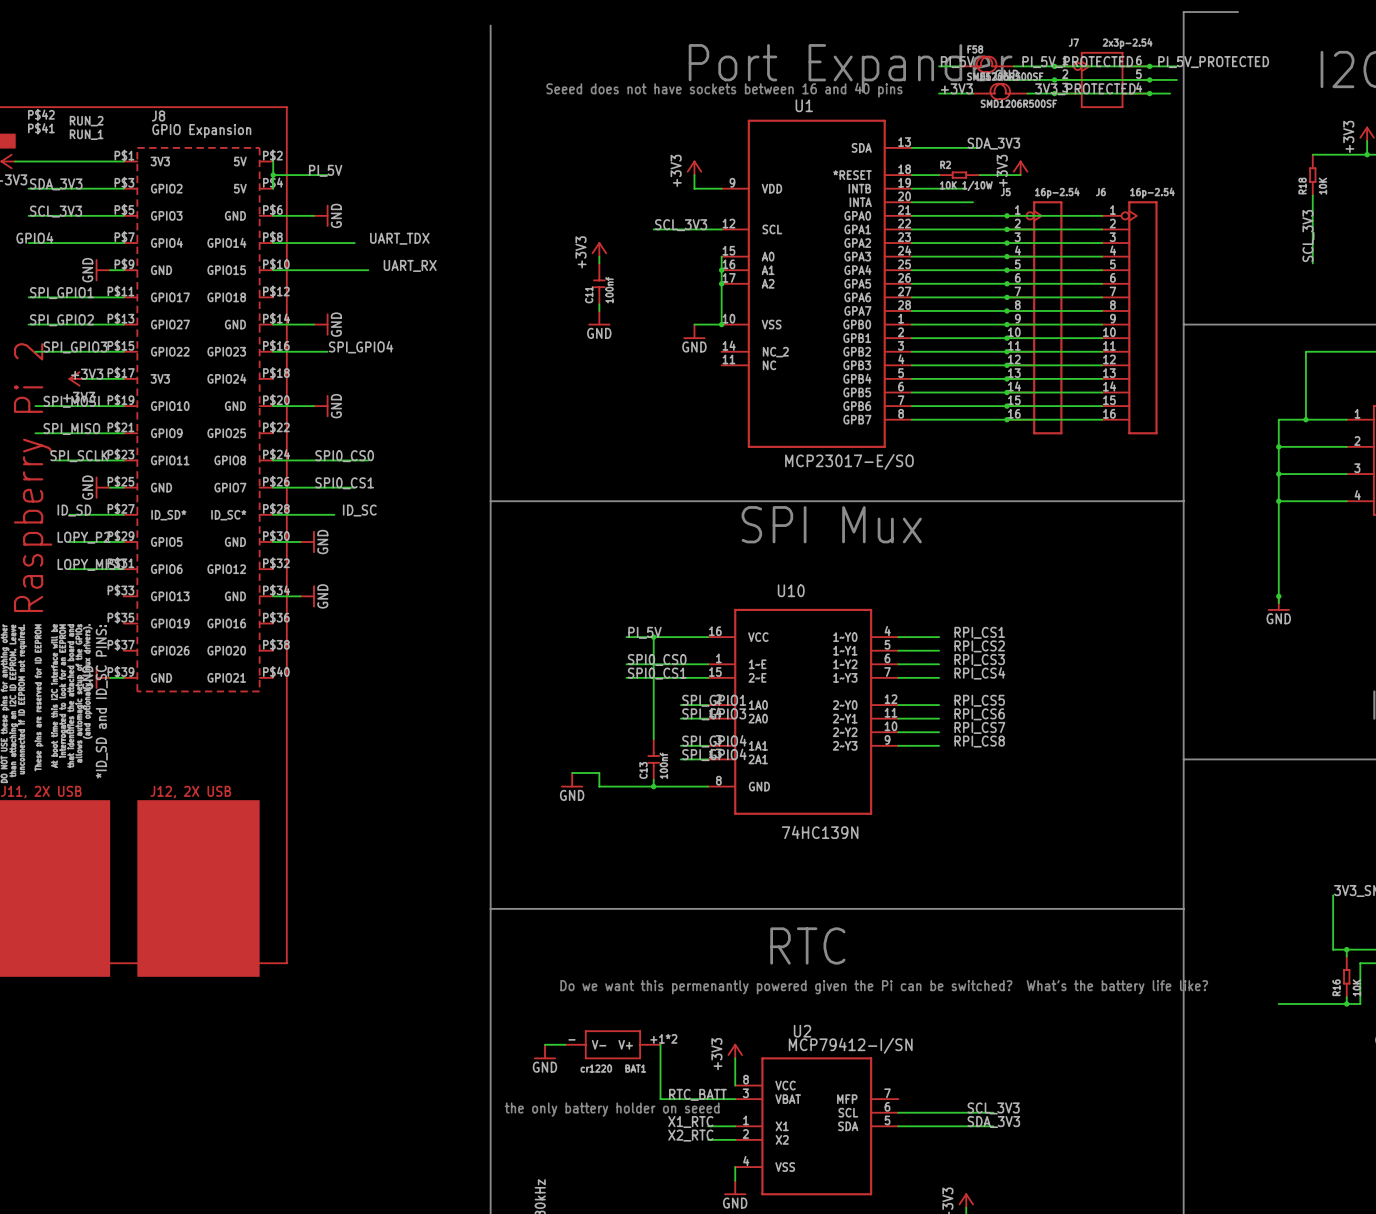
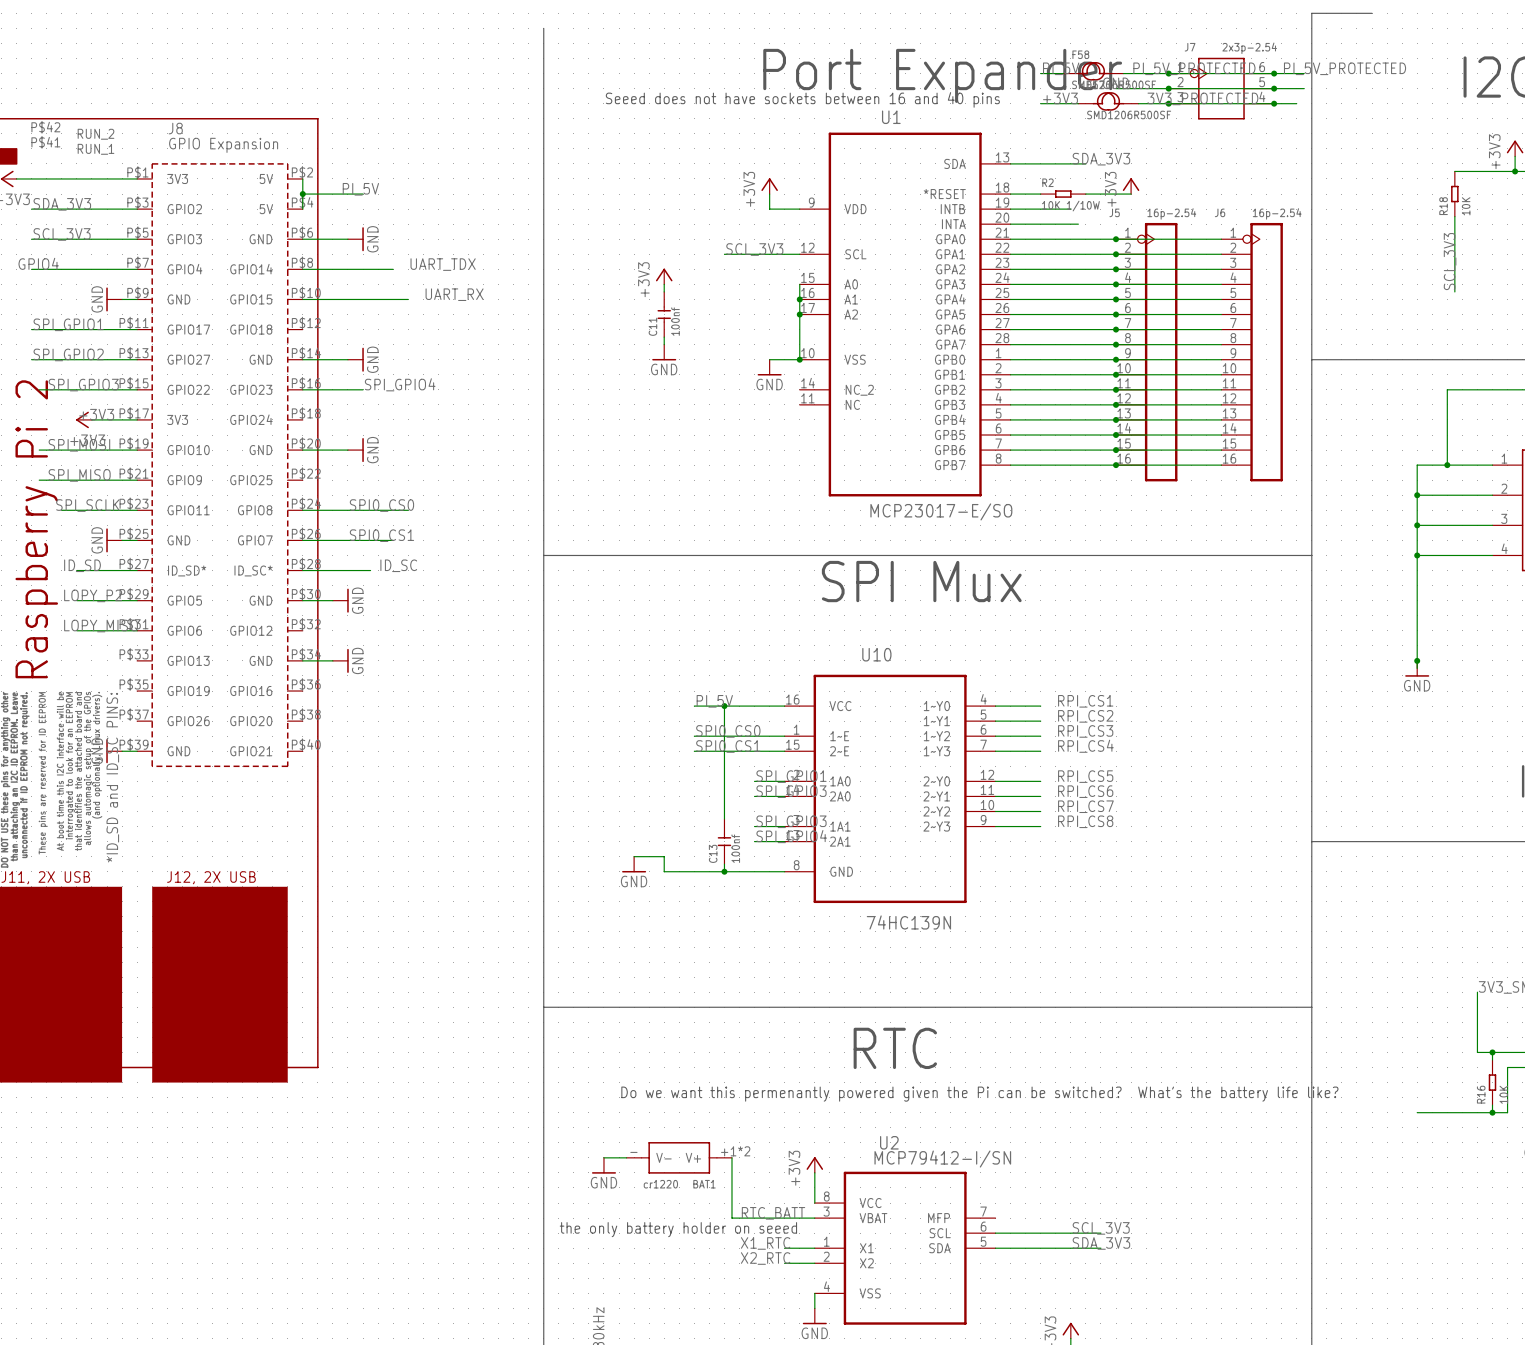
label: SPI_GPIO4 (714, 741) -> SPI_GPIO3 (791, 821)

